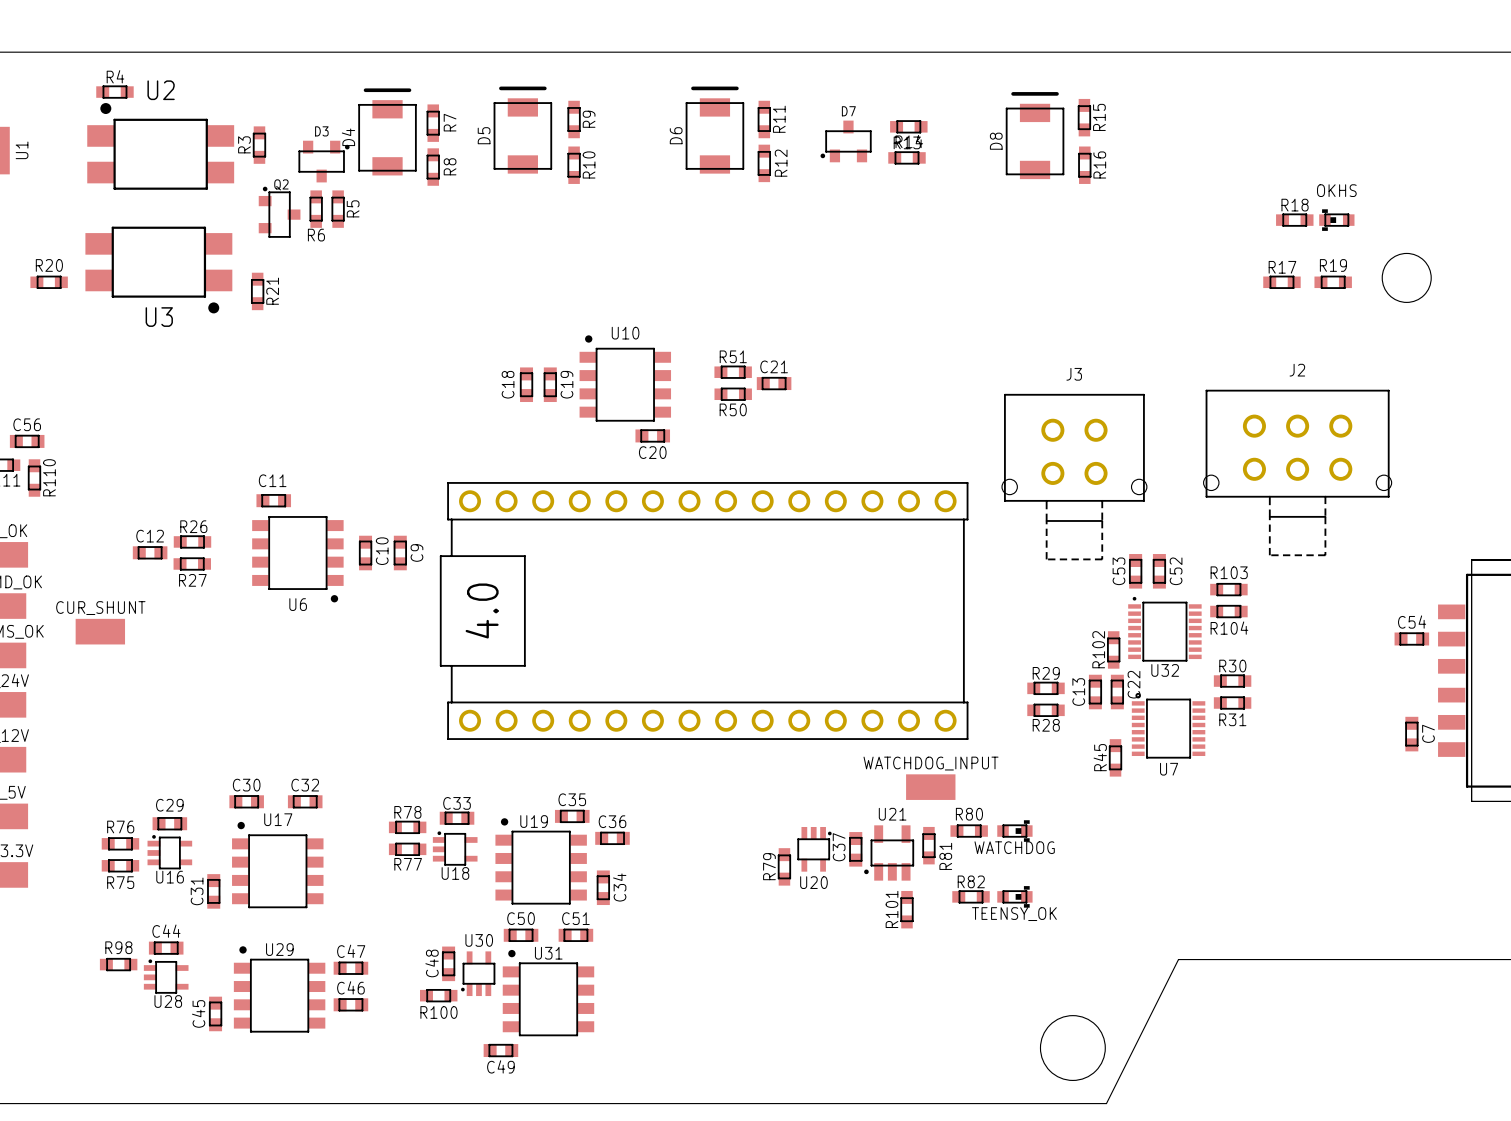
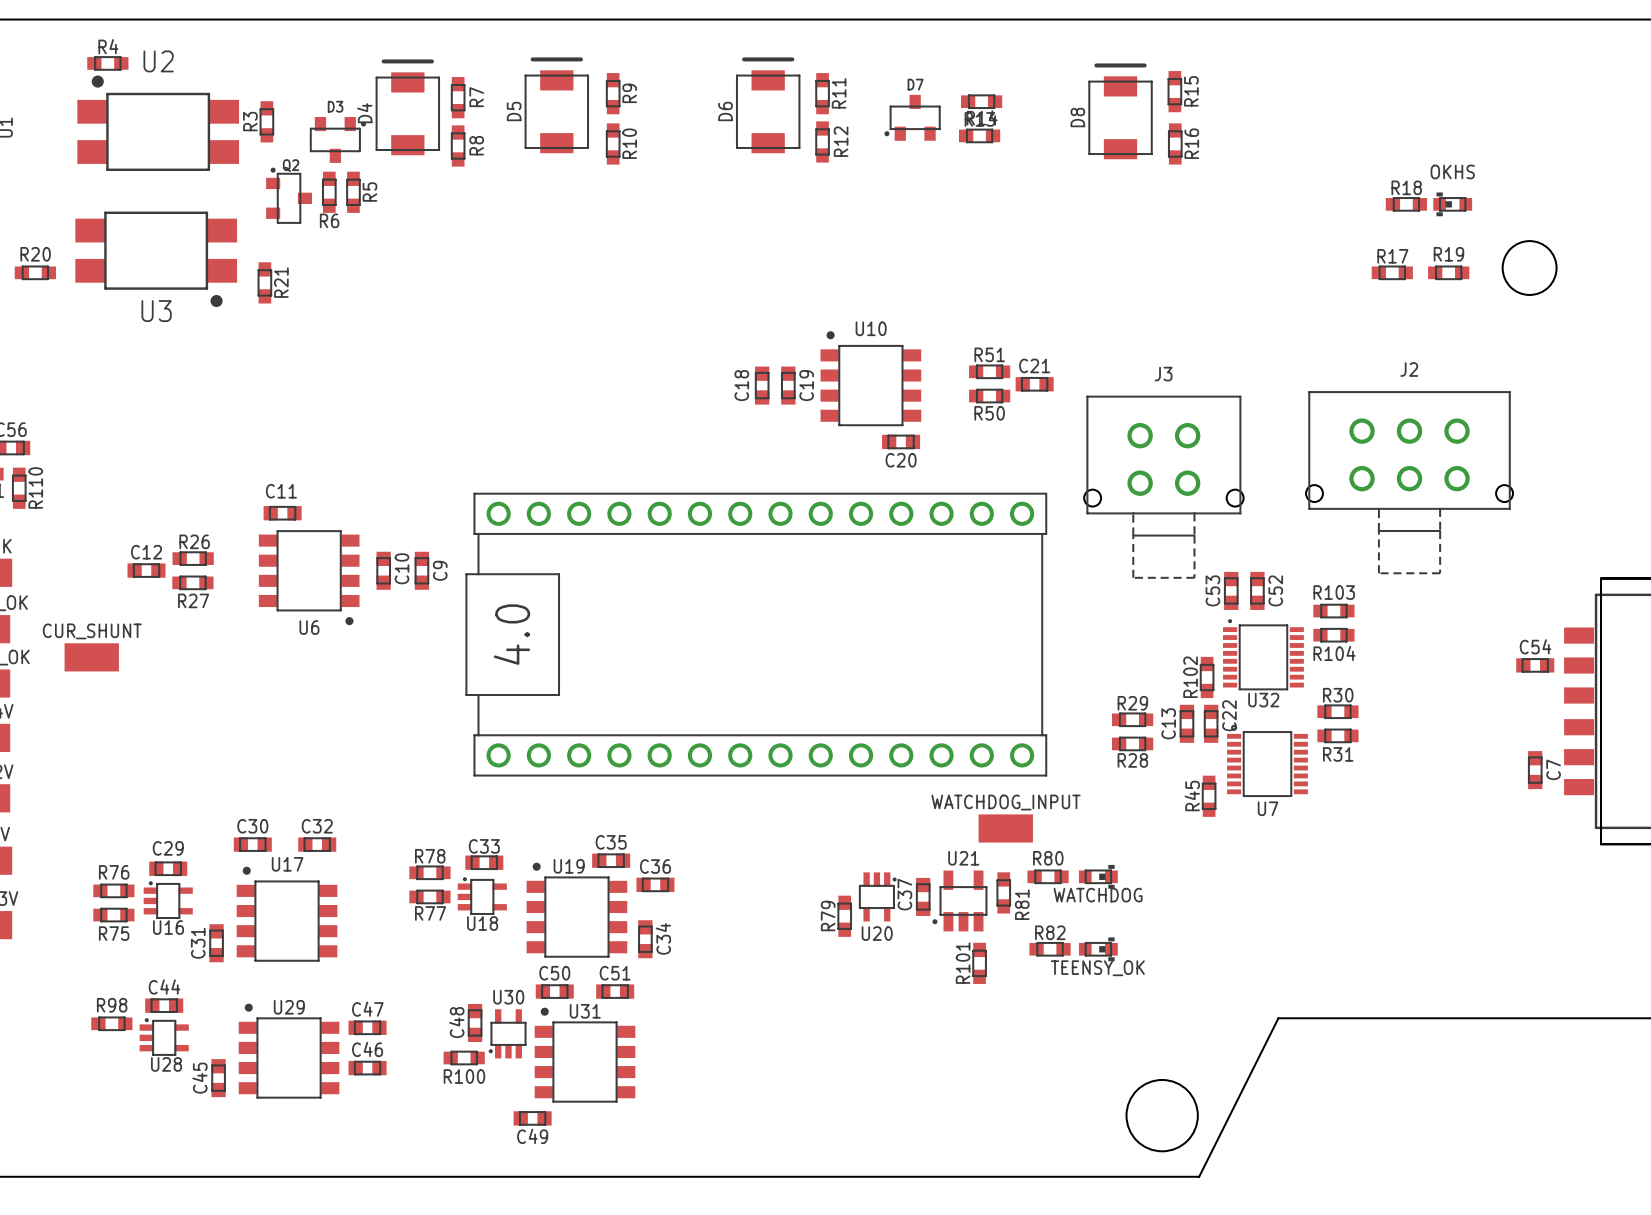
R51 position: (733, 372) -> (989, 371)
U10 position: (625, 378) -> (870, 378)
C21 position: (774, 383) -> (1034, 384)
C18 position: (526, 384) -> (762, 385)
C19 position: (550, 384) -> (788, 385)
R50 position: (733, 394) -> (989, 396)
C20 position: (652, 435) -> (901, 441)

